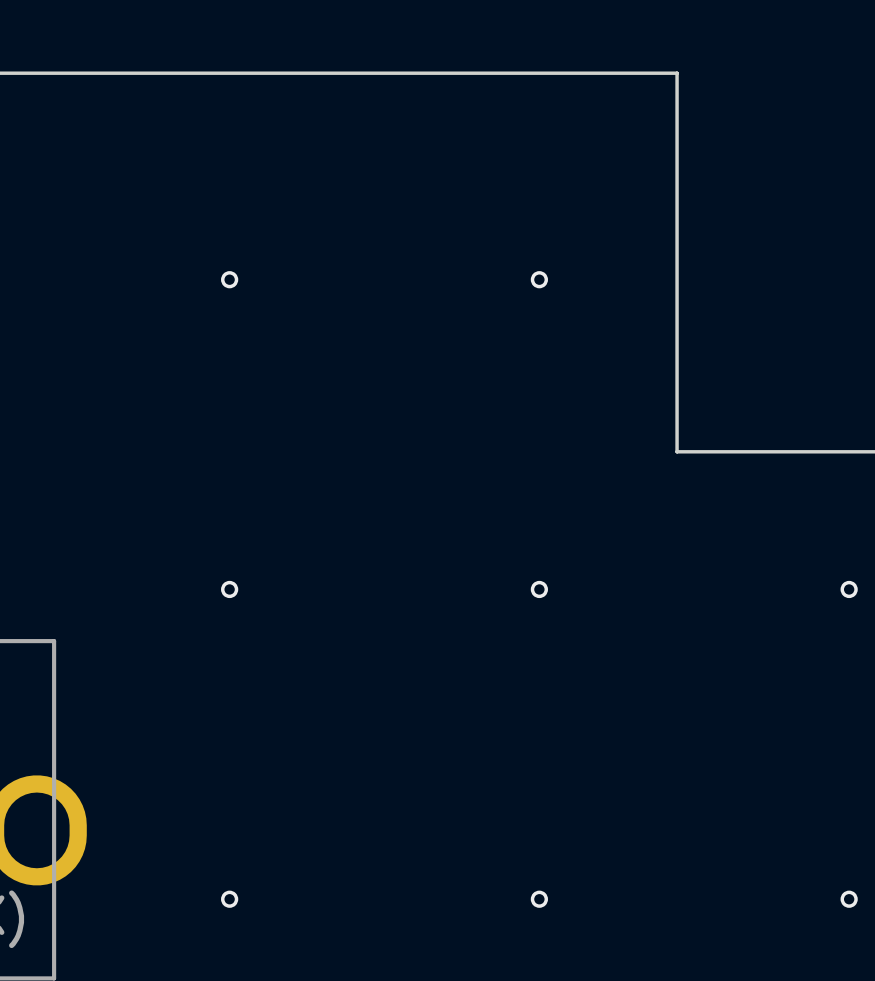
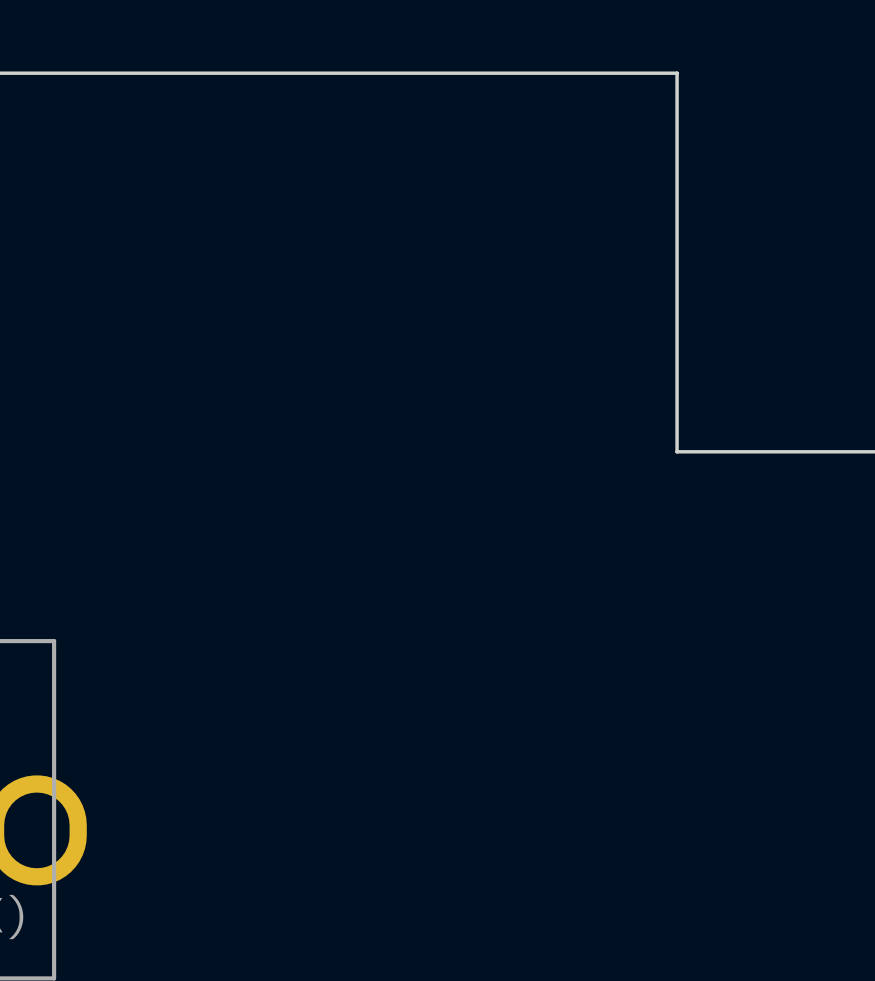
via: (229, 279) -> none
via: (539, 279) -> none
via: (229, 589) -> none
via: (539, 589) -> none
via: (849, 589) -> none
via: (229, 899) -> none
via: (539, 899) -> none
via: (849, 899) -> none

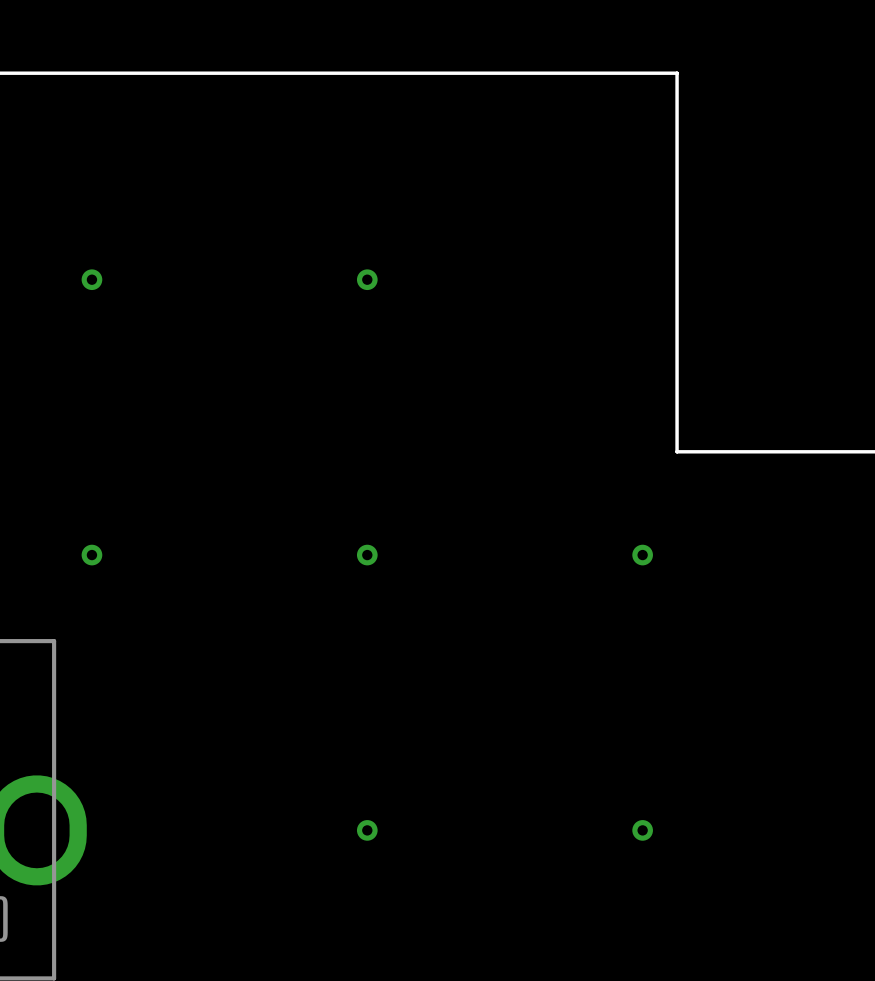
via: none -> (91, 279)
via: none -> (367, 279)
via: none -> (91, 555)
via: none -> (367, 555)
via: none -> (642, 555)
via: none -> (367, 830)
via: none -> (642, 830)

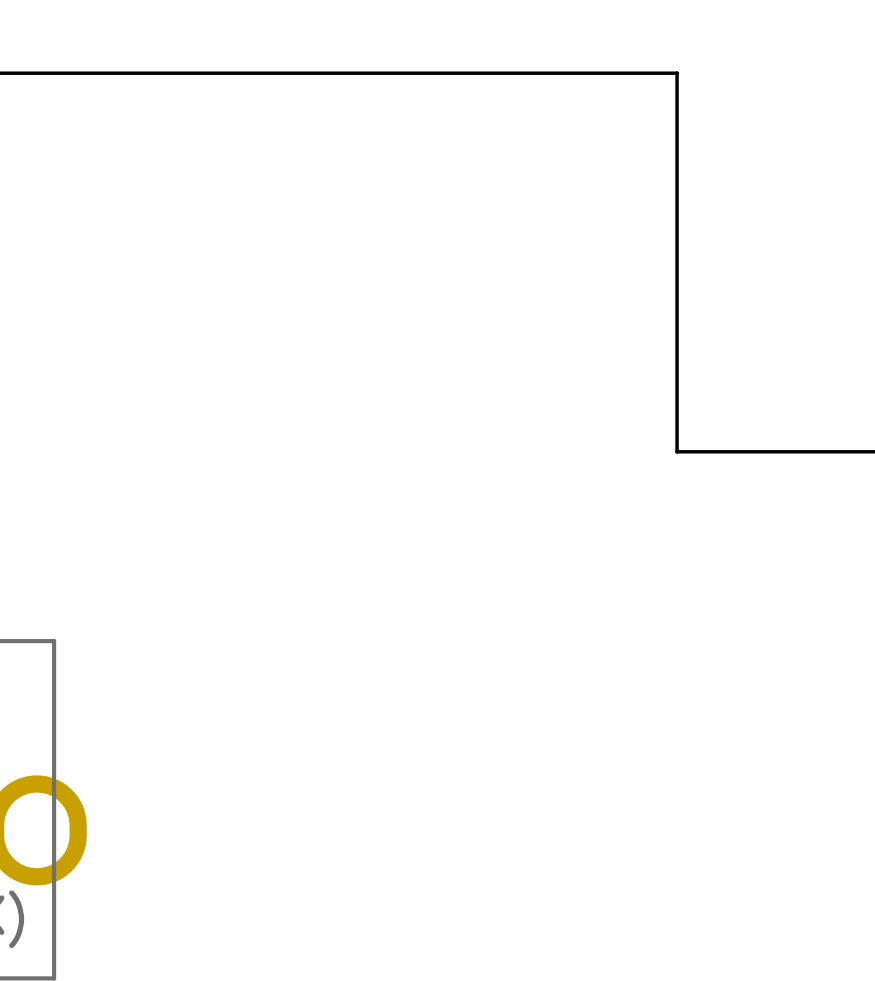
via: (91, 279) -> none
via: (367, 279) -> none
via: (91, 555) -> none
via: (367, 555) -> none
via: (642, 555) -> none
via: (367, 830) -> none
via: (642, 830) -> none

